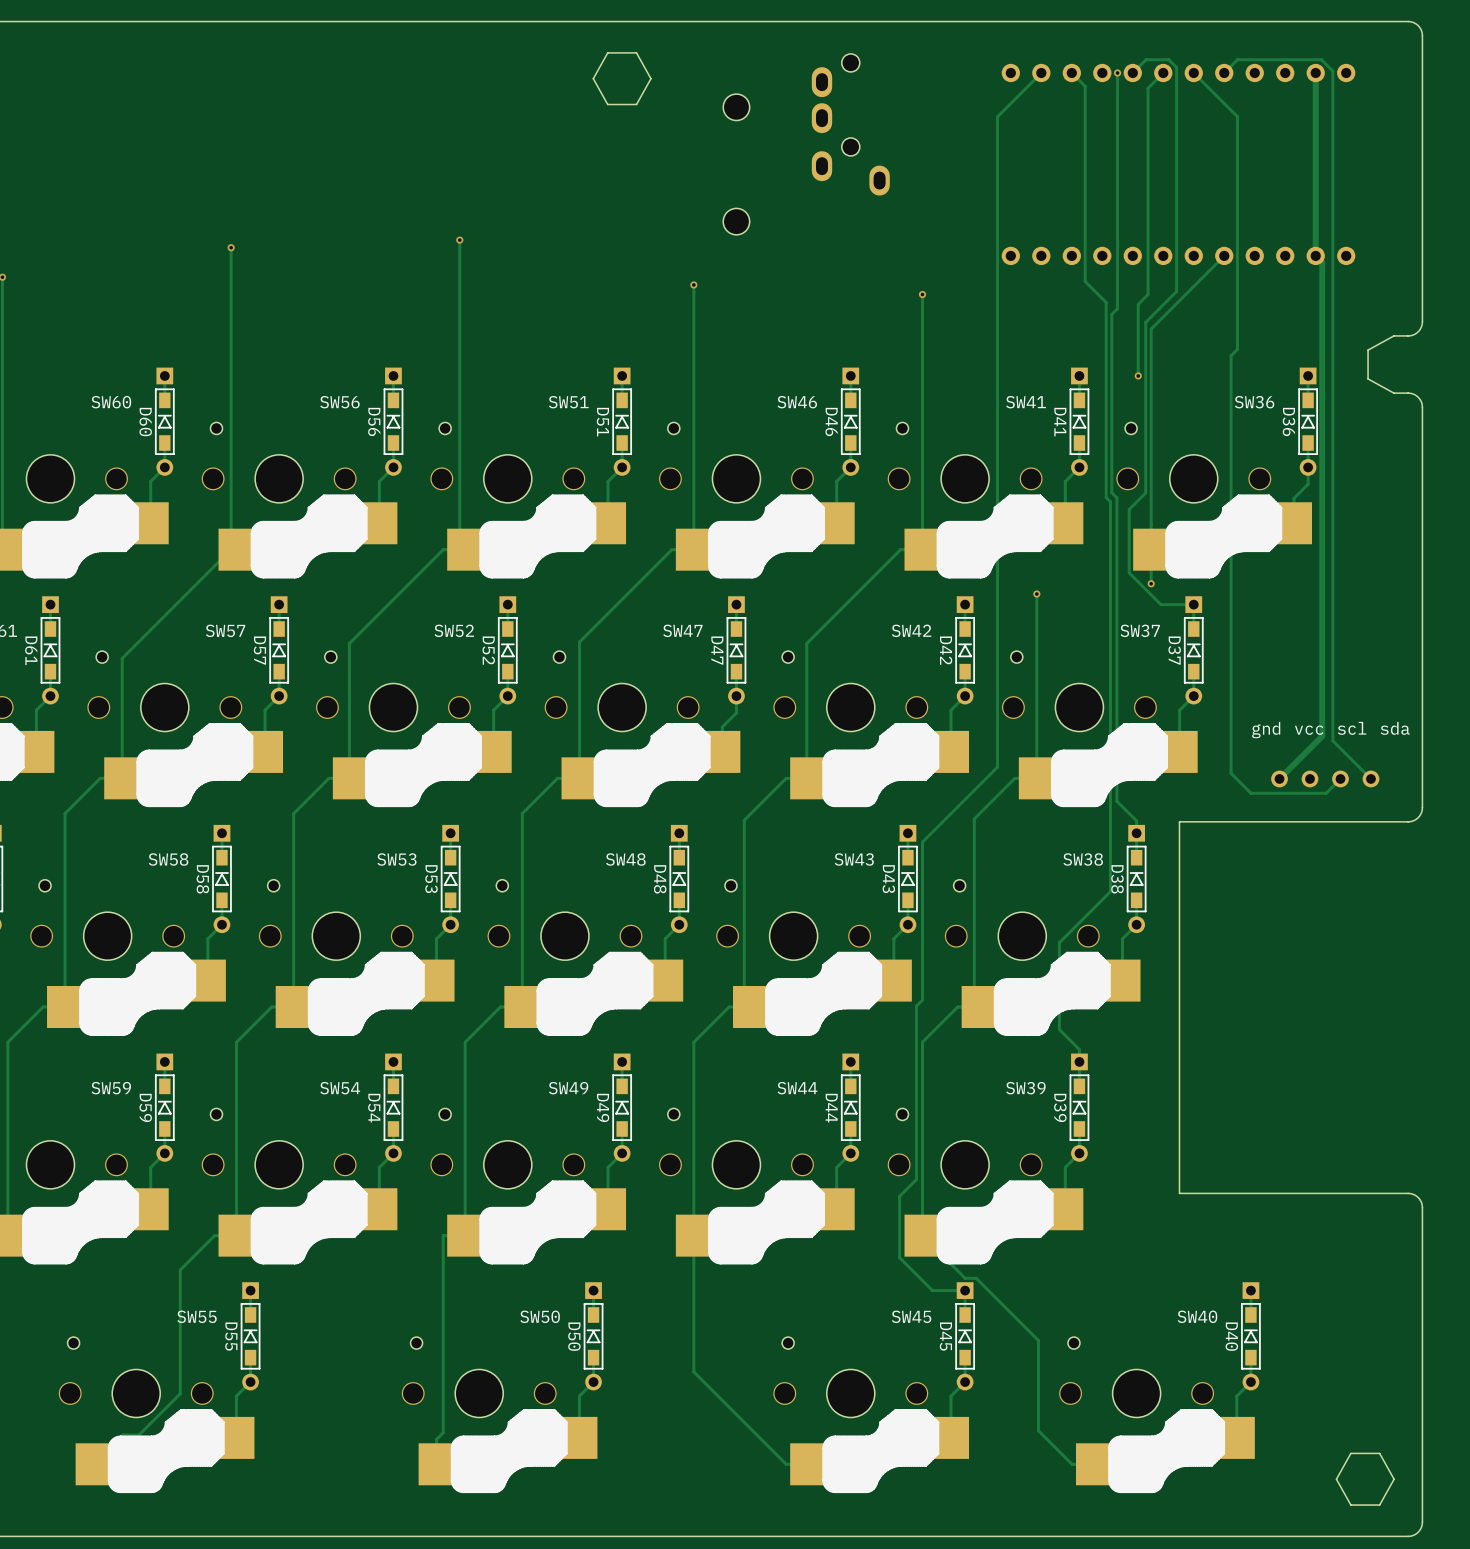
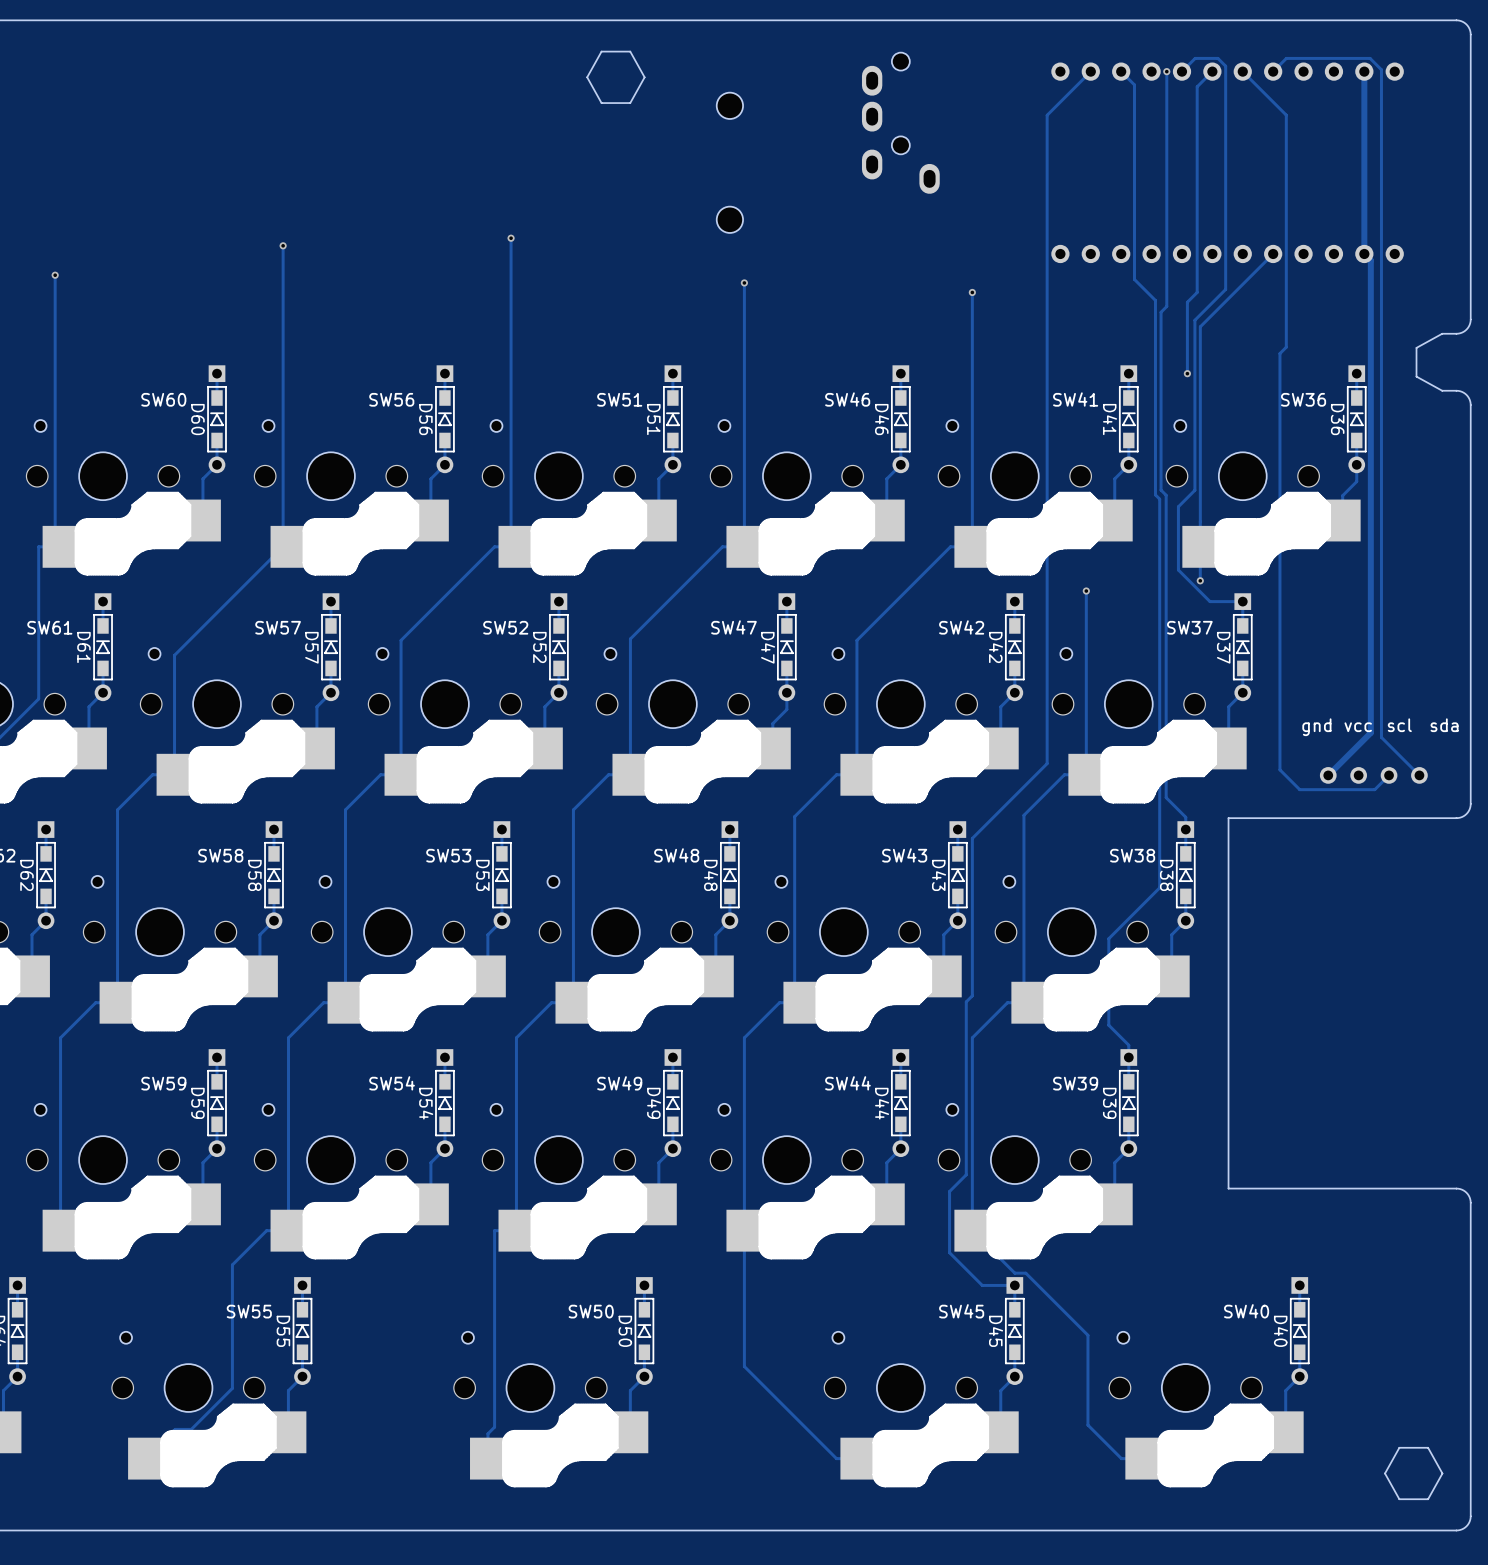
drawing position: (622, 78) -> (615, 77)
part position: (736, 107) -> (729, 105)
part position: (736, 221) -> (729, 219)

